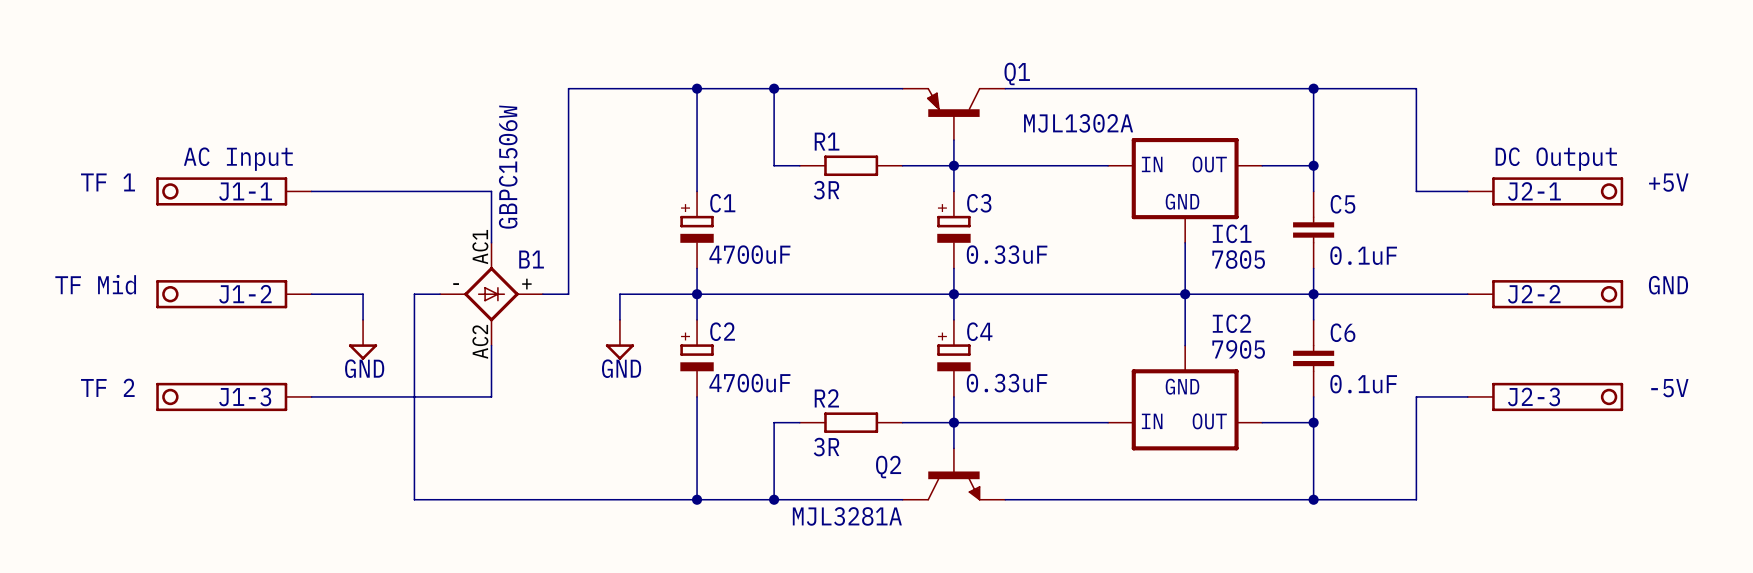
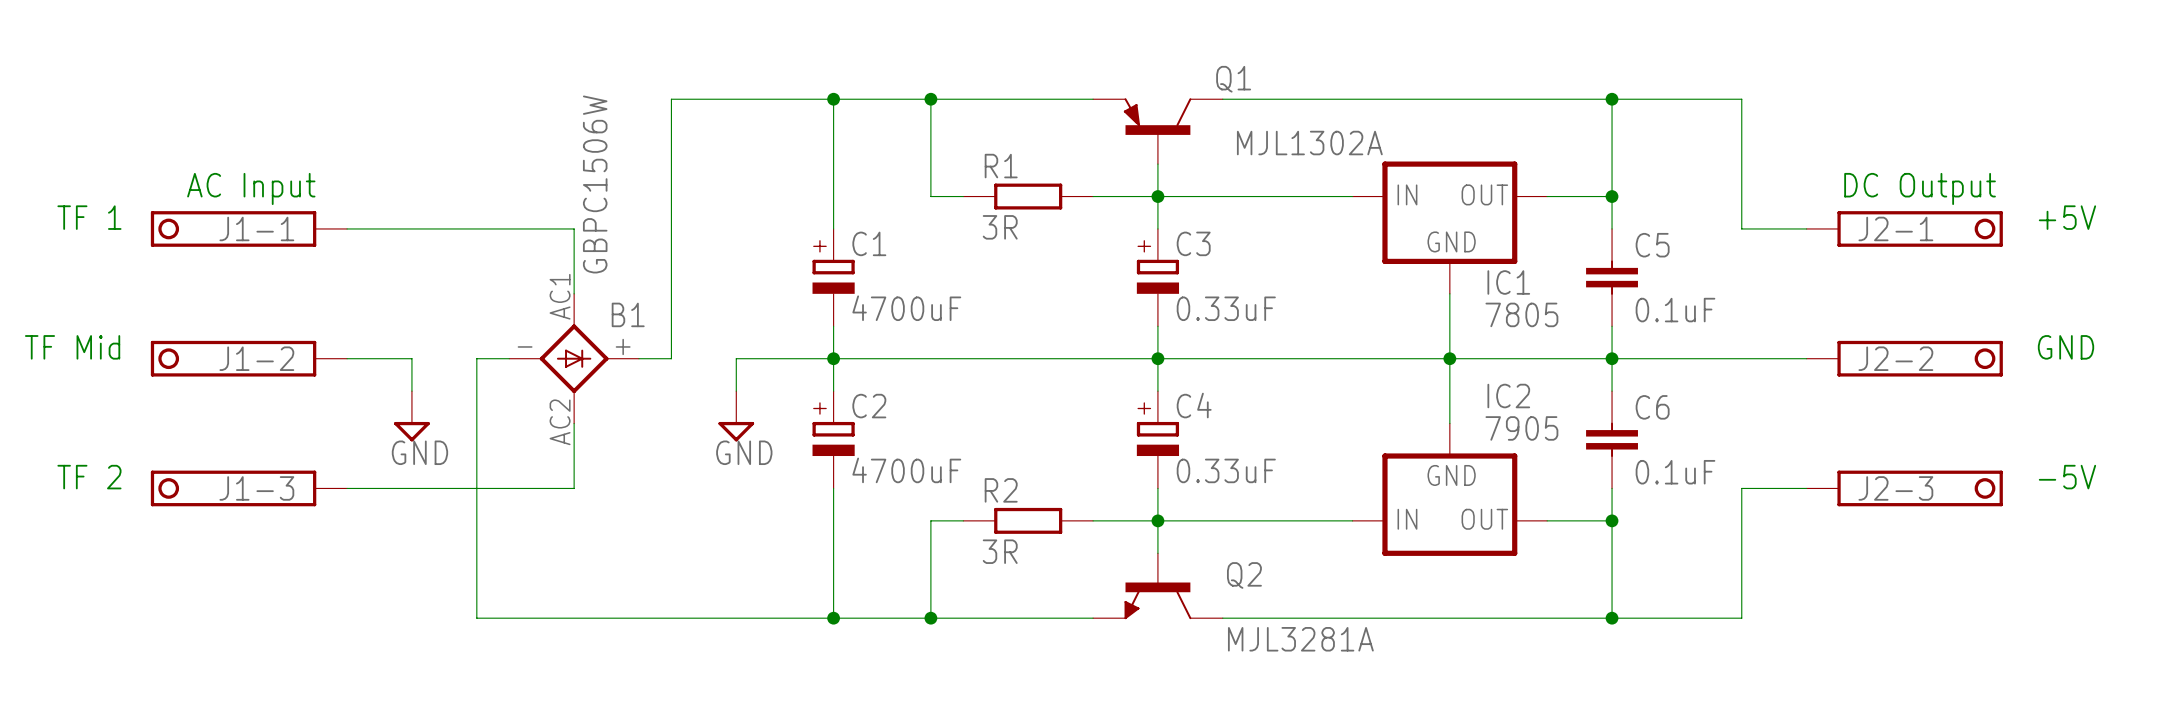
Q2 flip: as is (953, 485) -> left-right (1157, 600)

